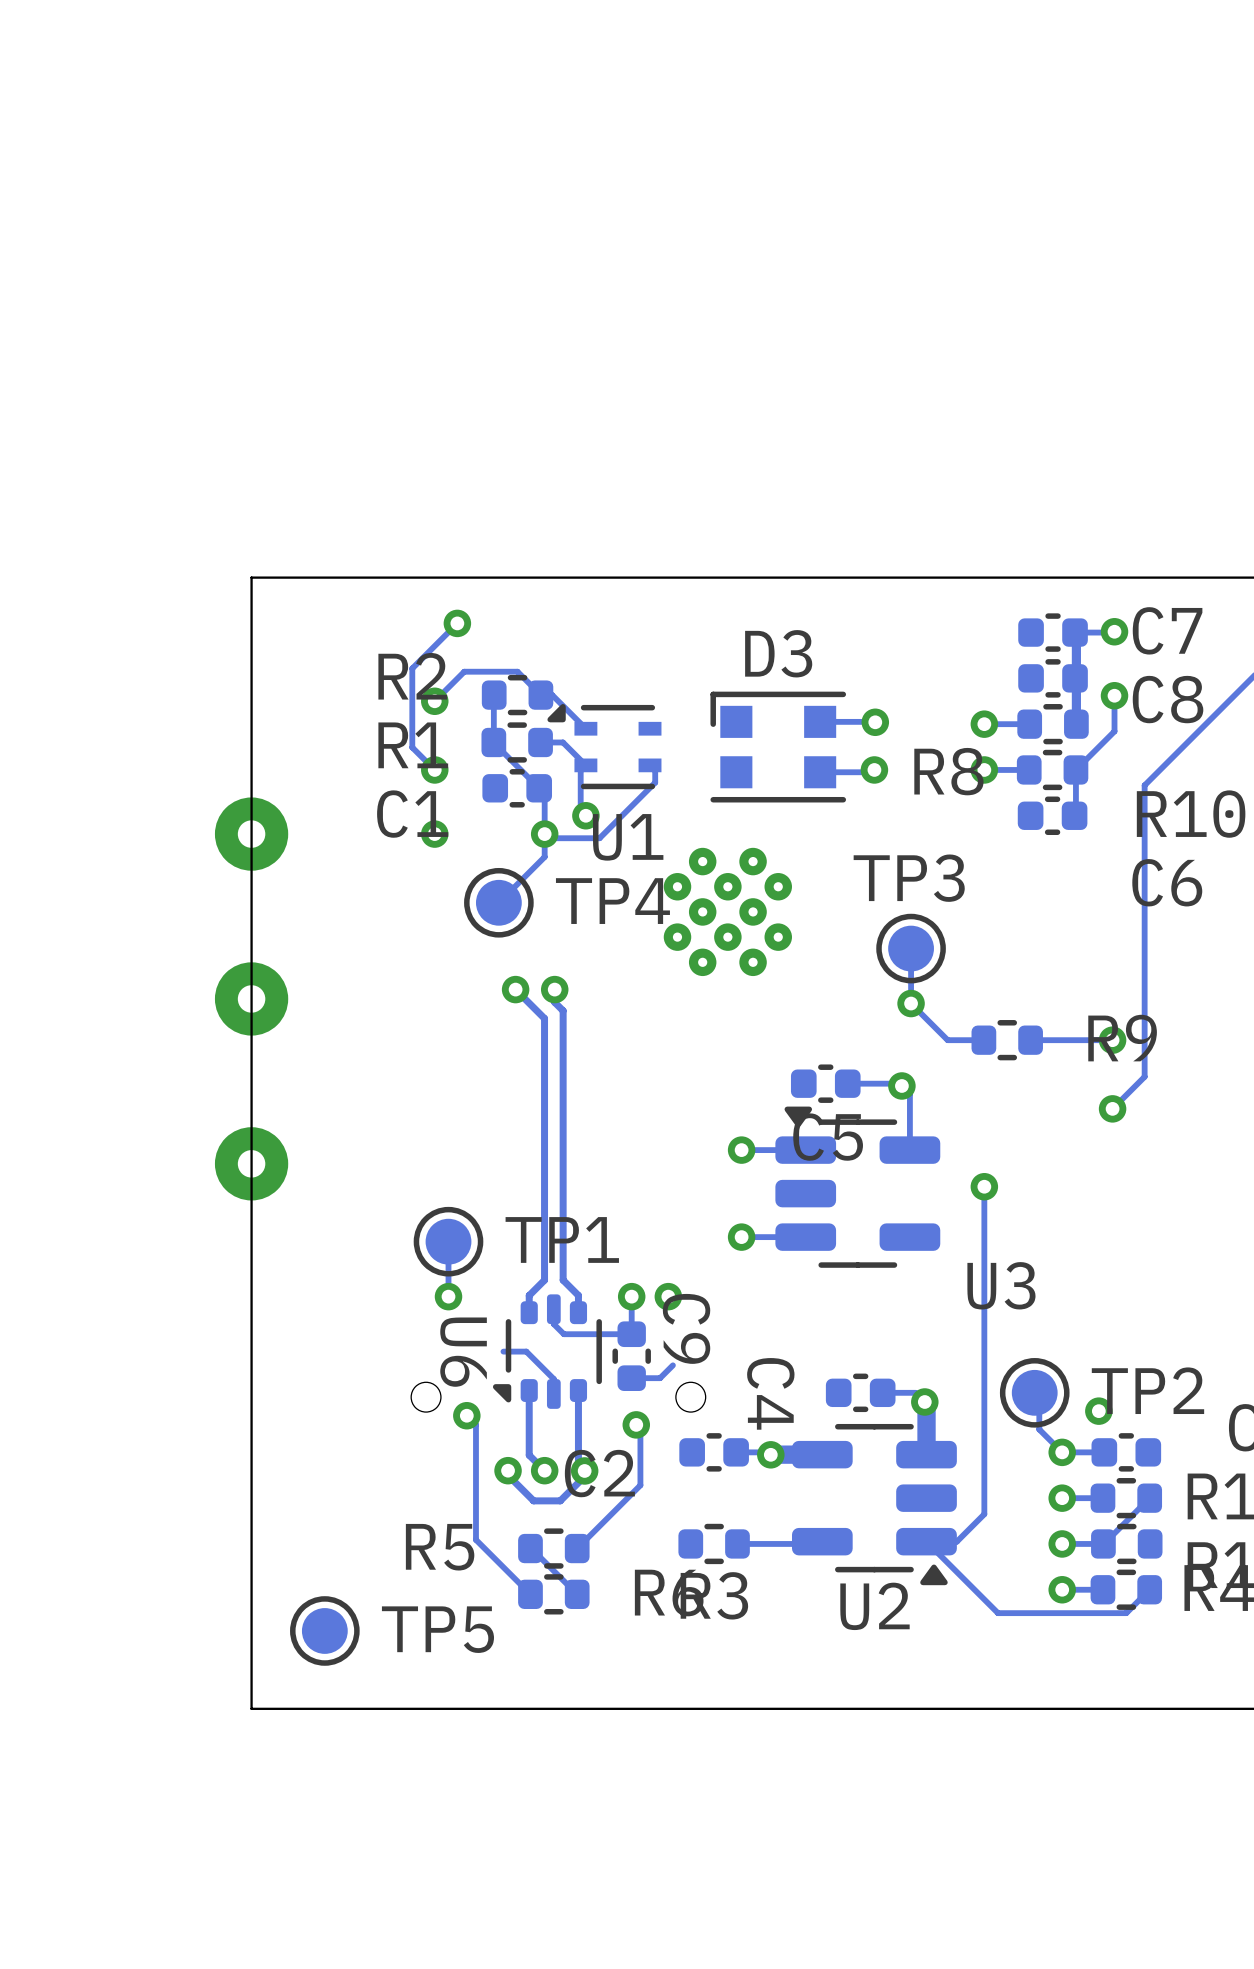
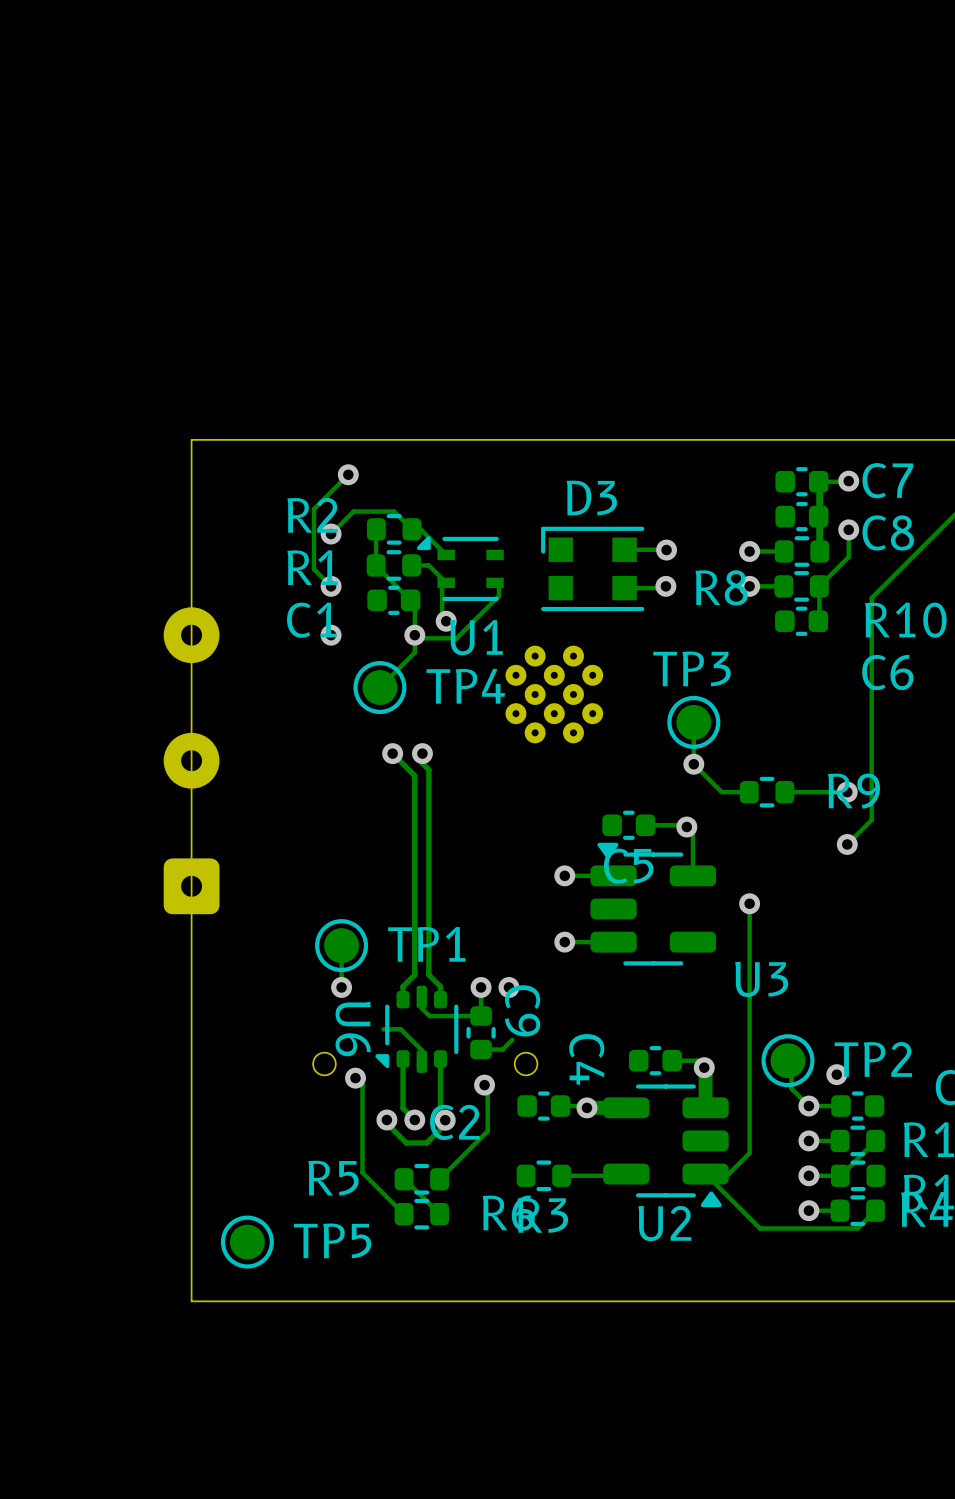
part footprint: [214, 797, 289, 1201] -> [163, 607, 220, 915]

